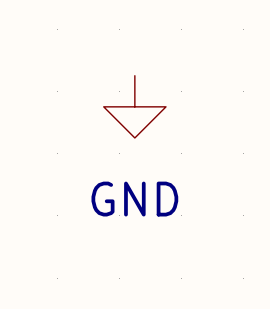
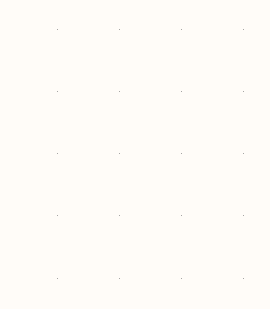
power symbol: GND (134, 106) -> none

